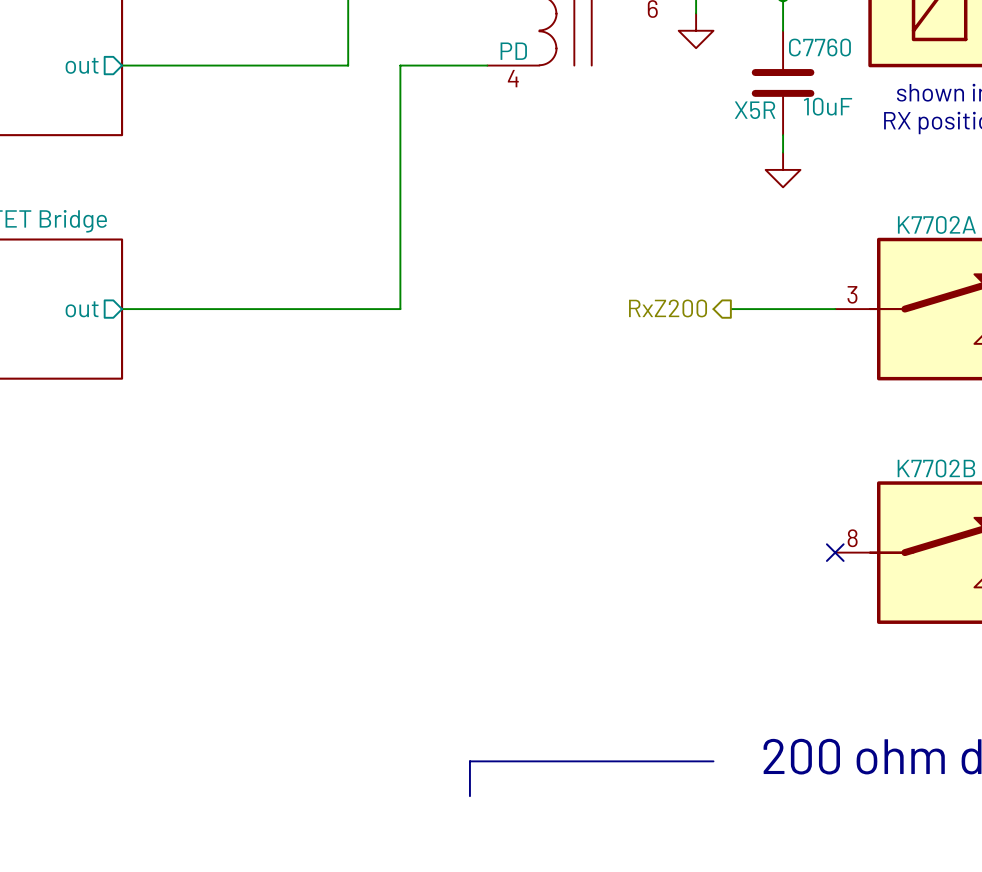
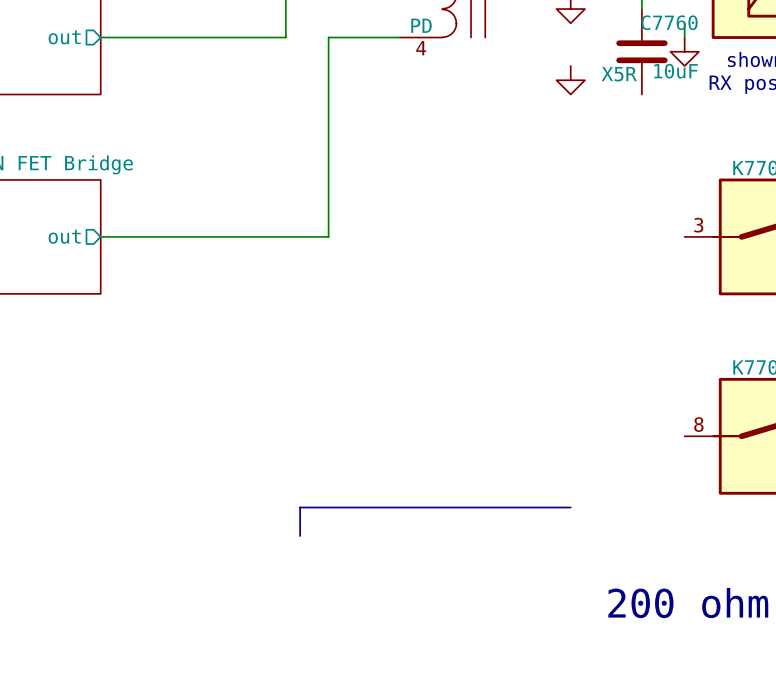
power symbol: none -> (684, 51)
power symbol: none -> (570, 80)
wire: (783, 135) (783, 152) -> (684, 23) (684, 37)
power symbol: (783, 169) -> none
hierarchical label: RxZ200 (668, 308) -> none
wire: (730, 309) (835, 309) -> none
no-connect mark: (835, 552) -> none
line: none -> (570, 507) (300, 507) (300, 535)
line: (713, 761) (469, 761) (469, 796) -> none

